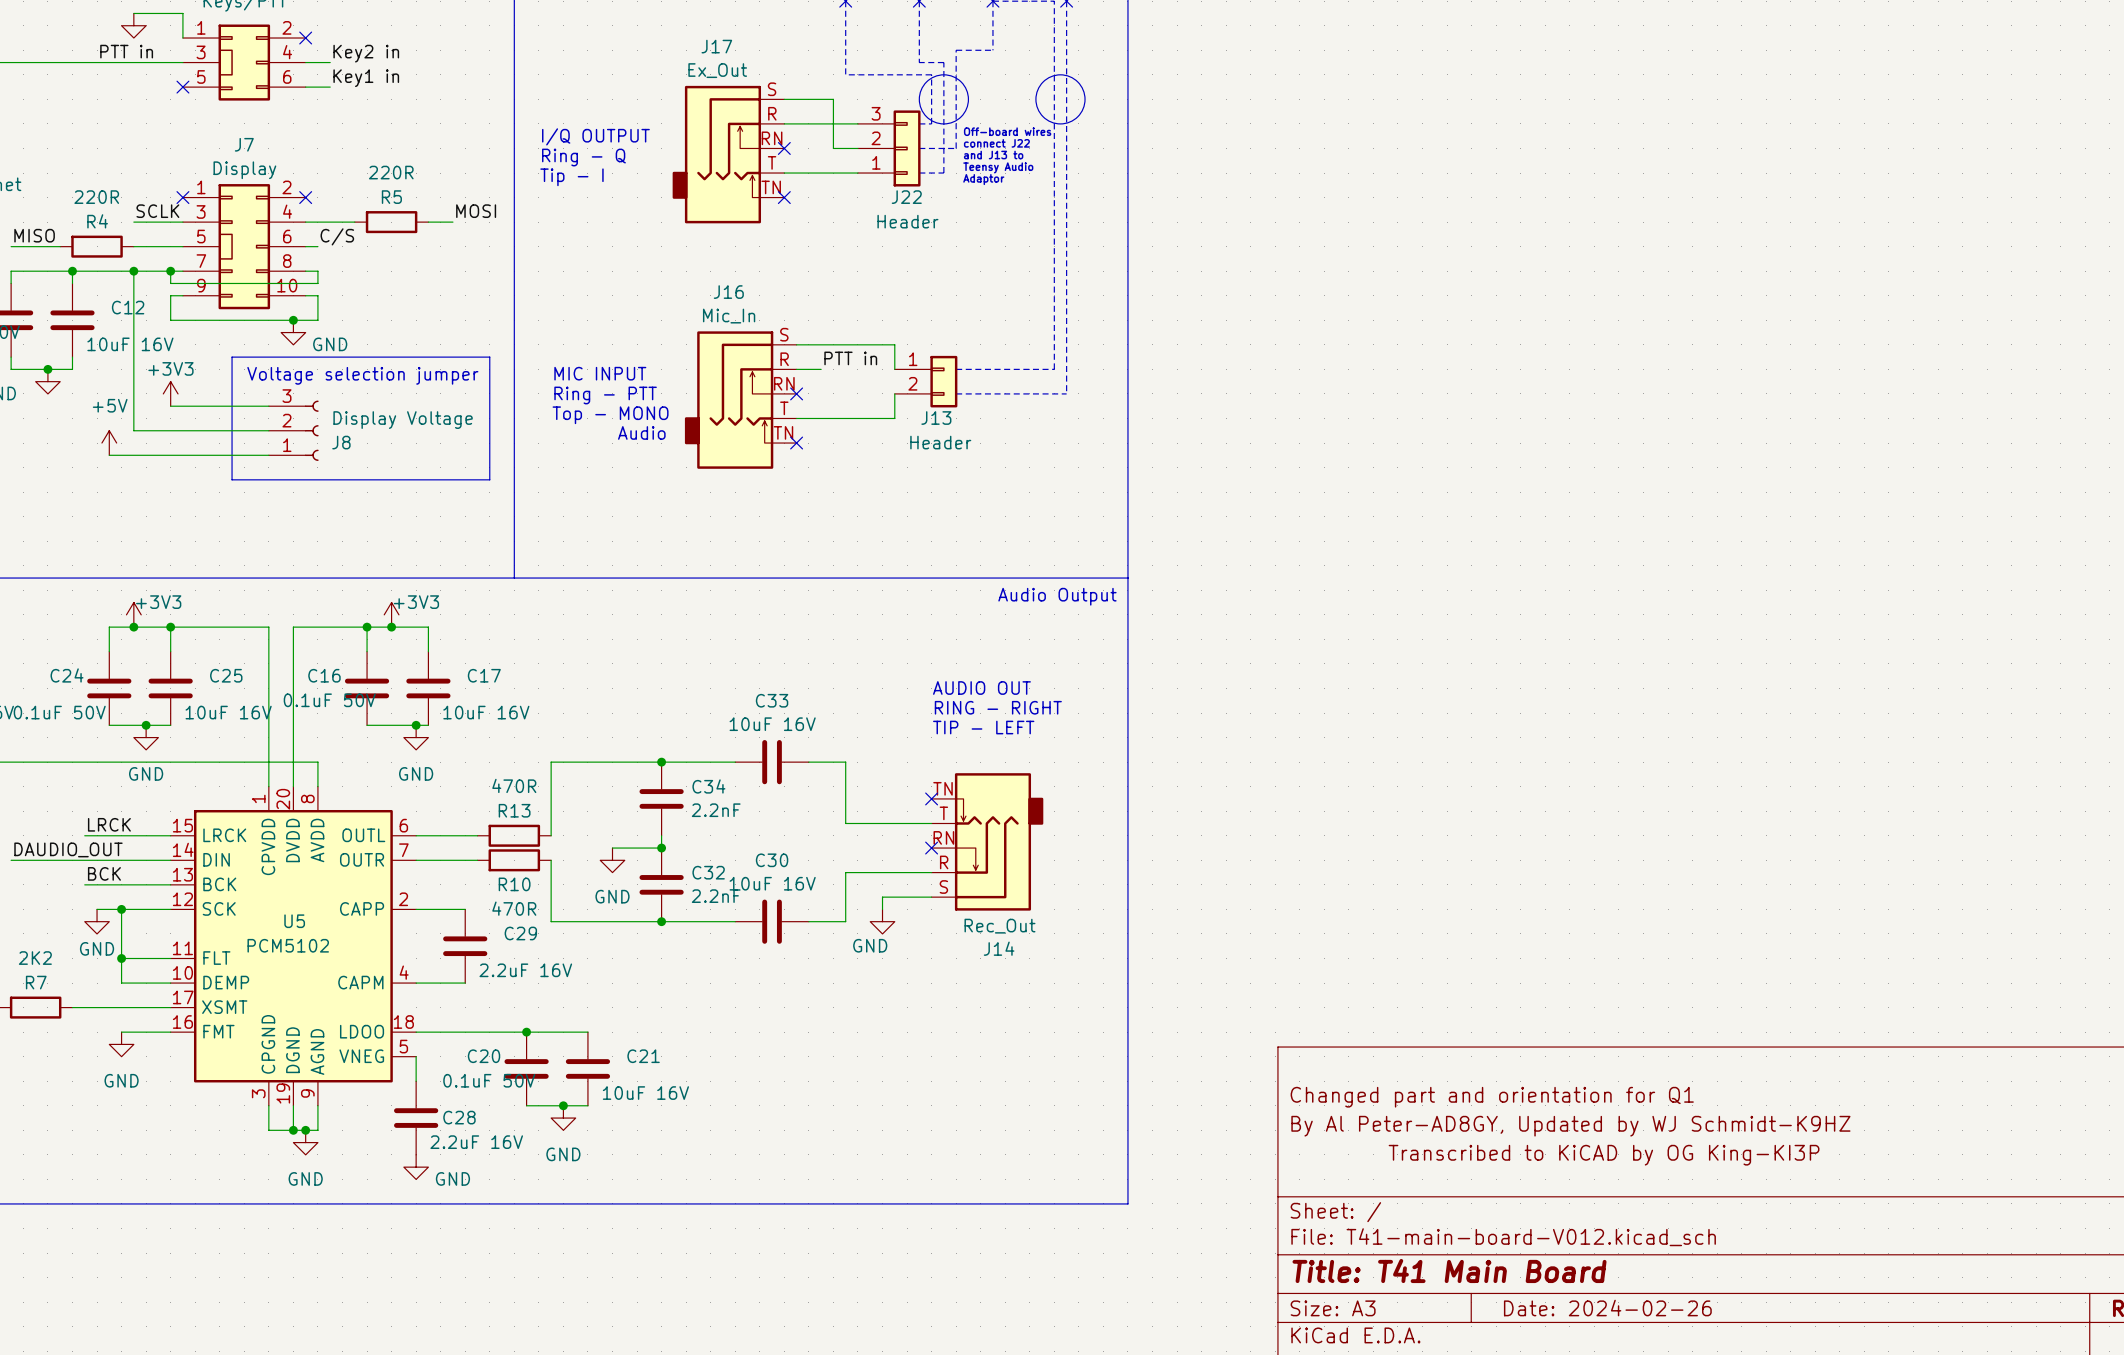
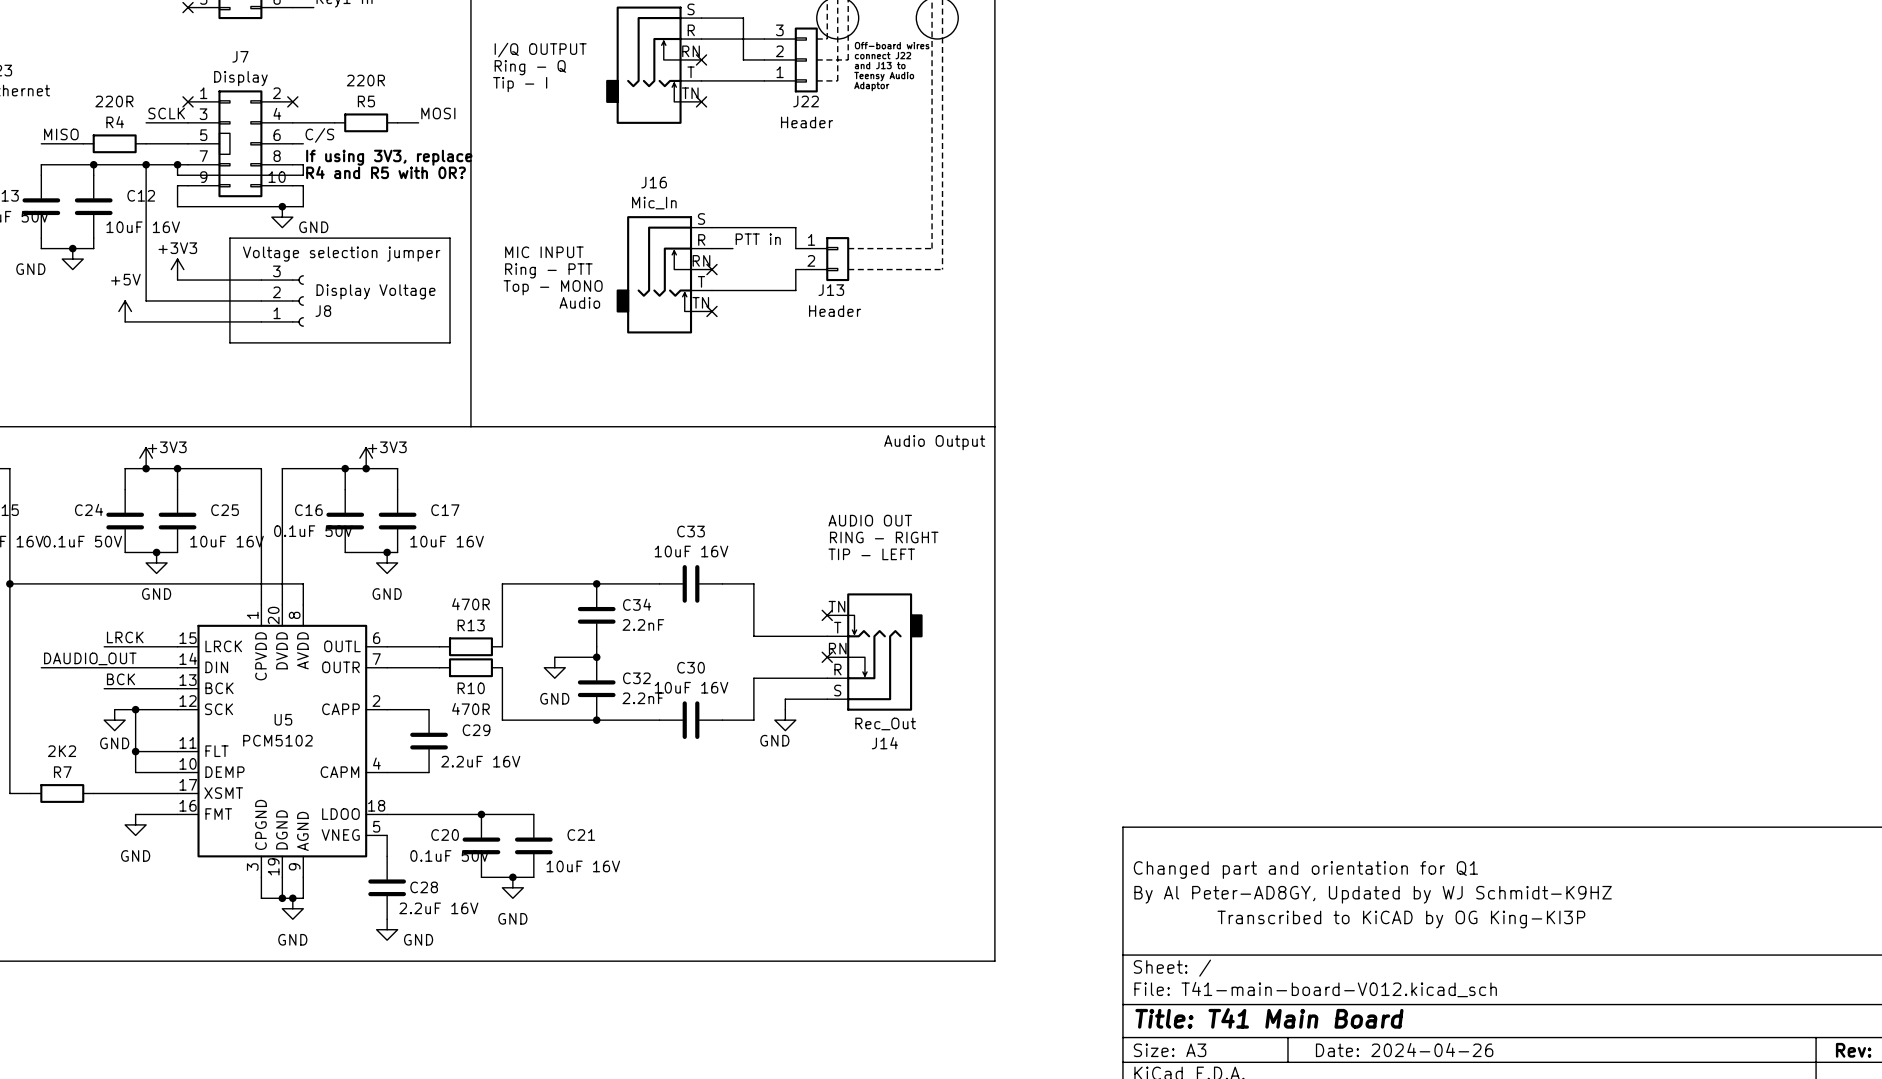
text: none -> If using 3V3, replace (389, 157)
text: none -> R4 and R5 with 0R? (386, 172)
title block: Date: 2024-02-26 (1607, 1308) -> Date: 2024-04-26 (1404, 1050)

